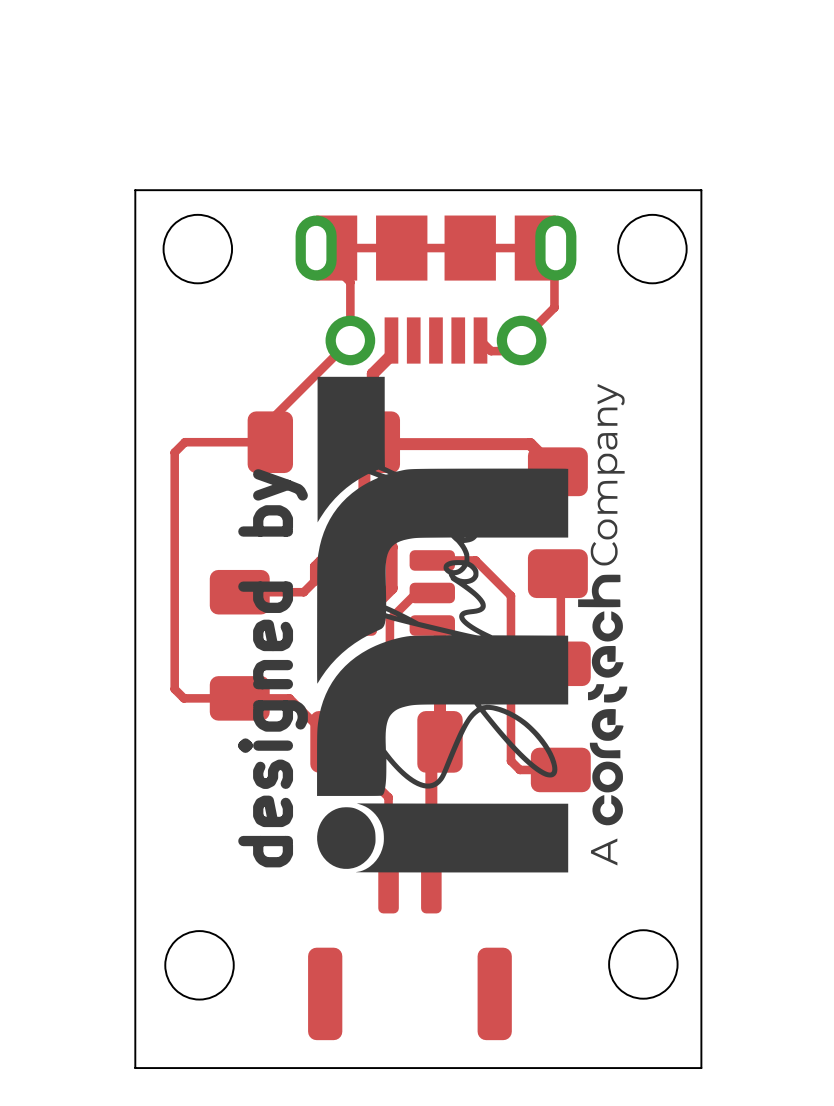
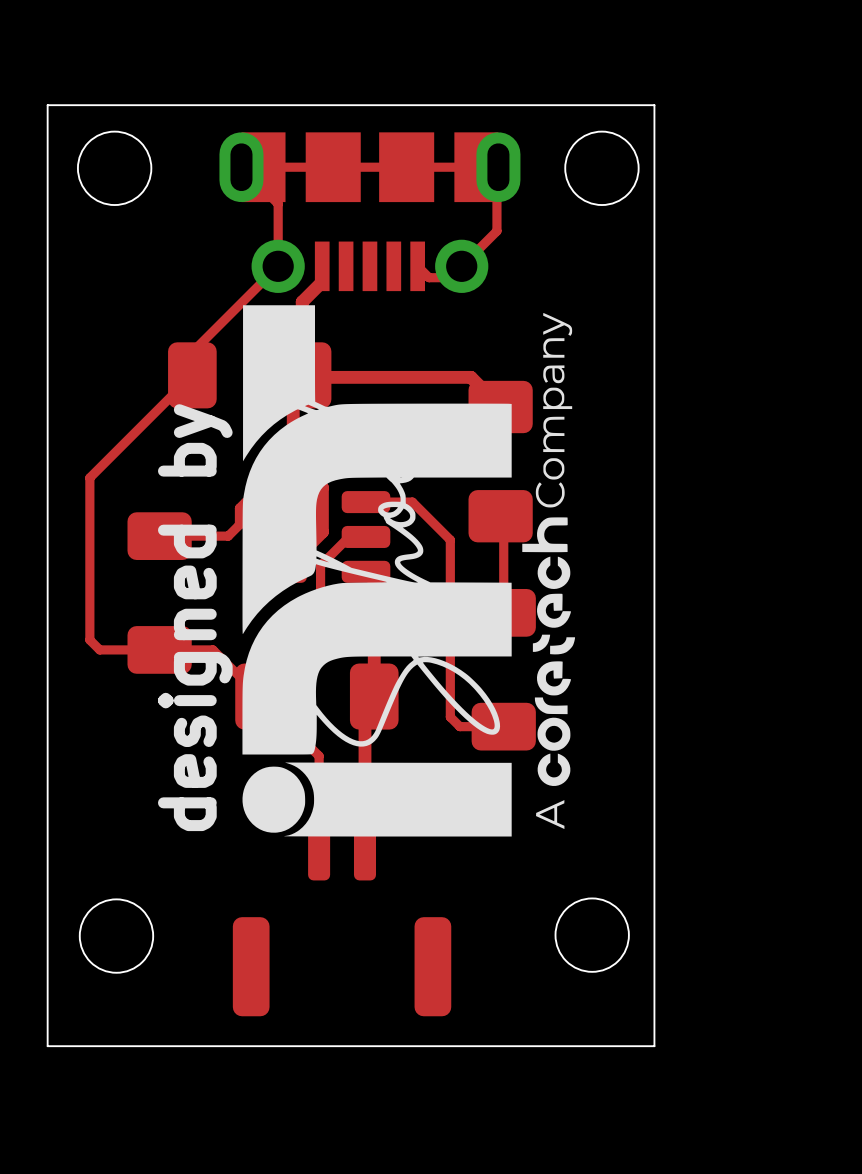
top track: (270, 442) (184, 442) (174, 452) (174, 537) -> (192, 375) (89, 477)

